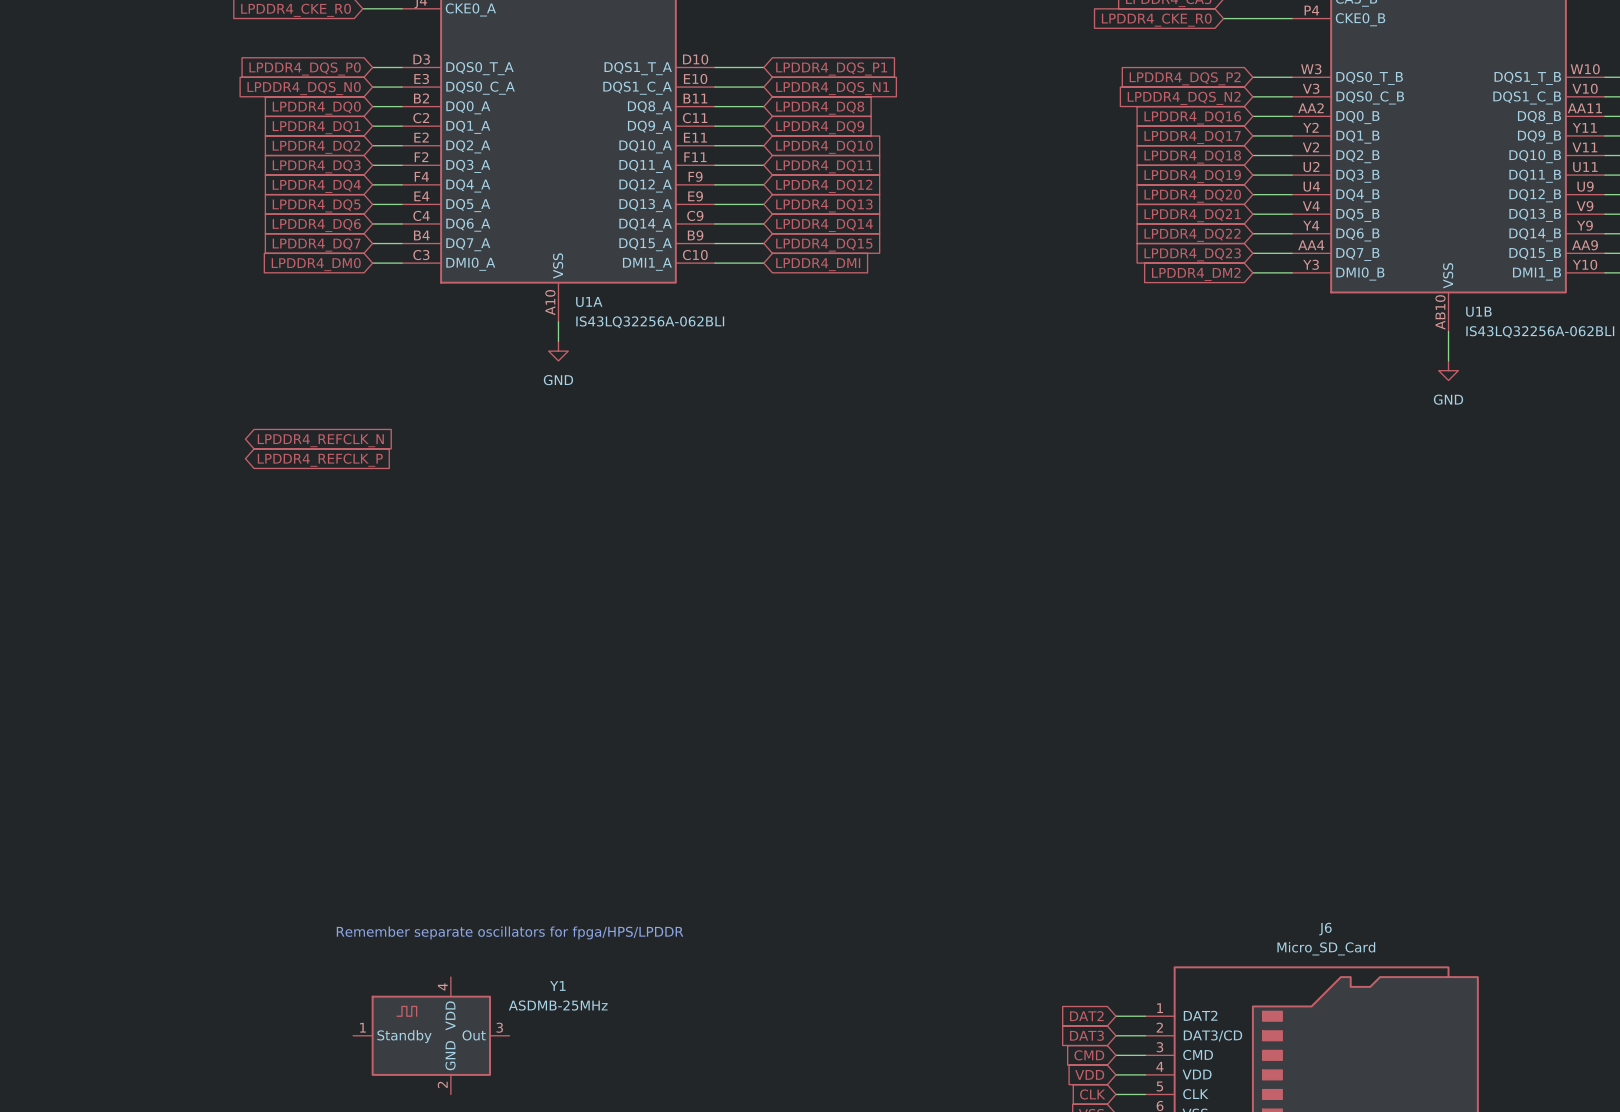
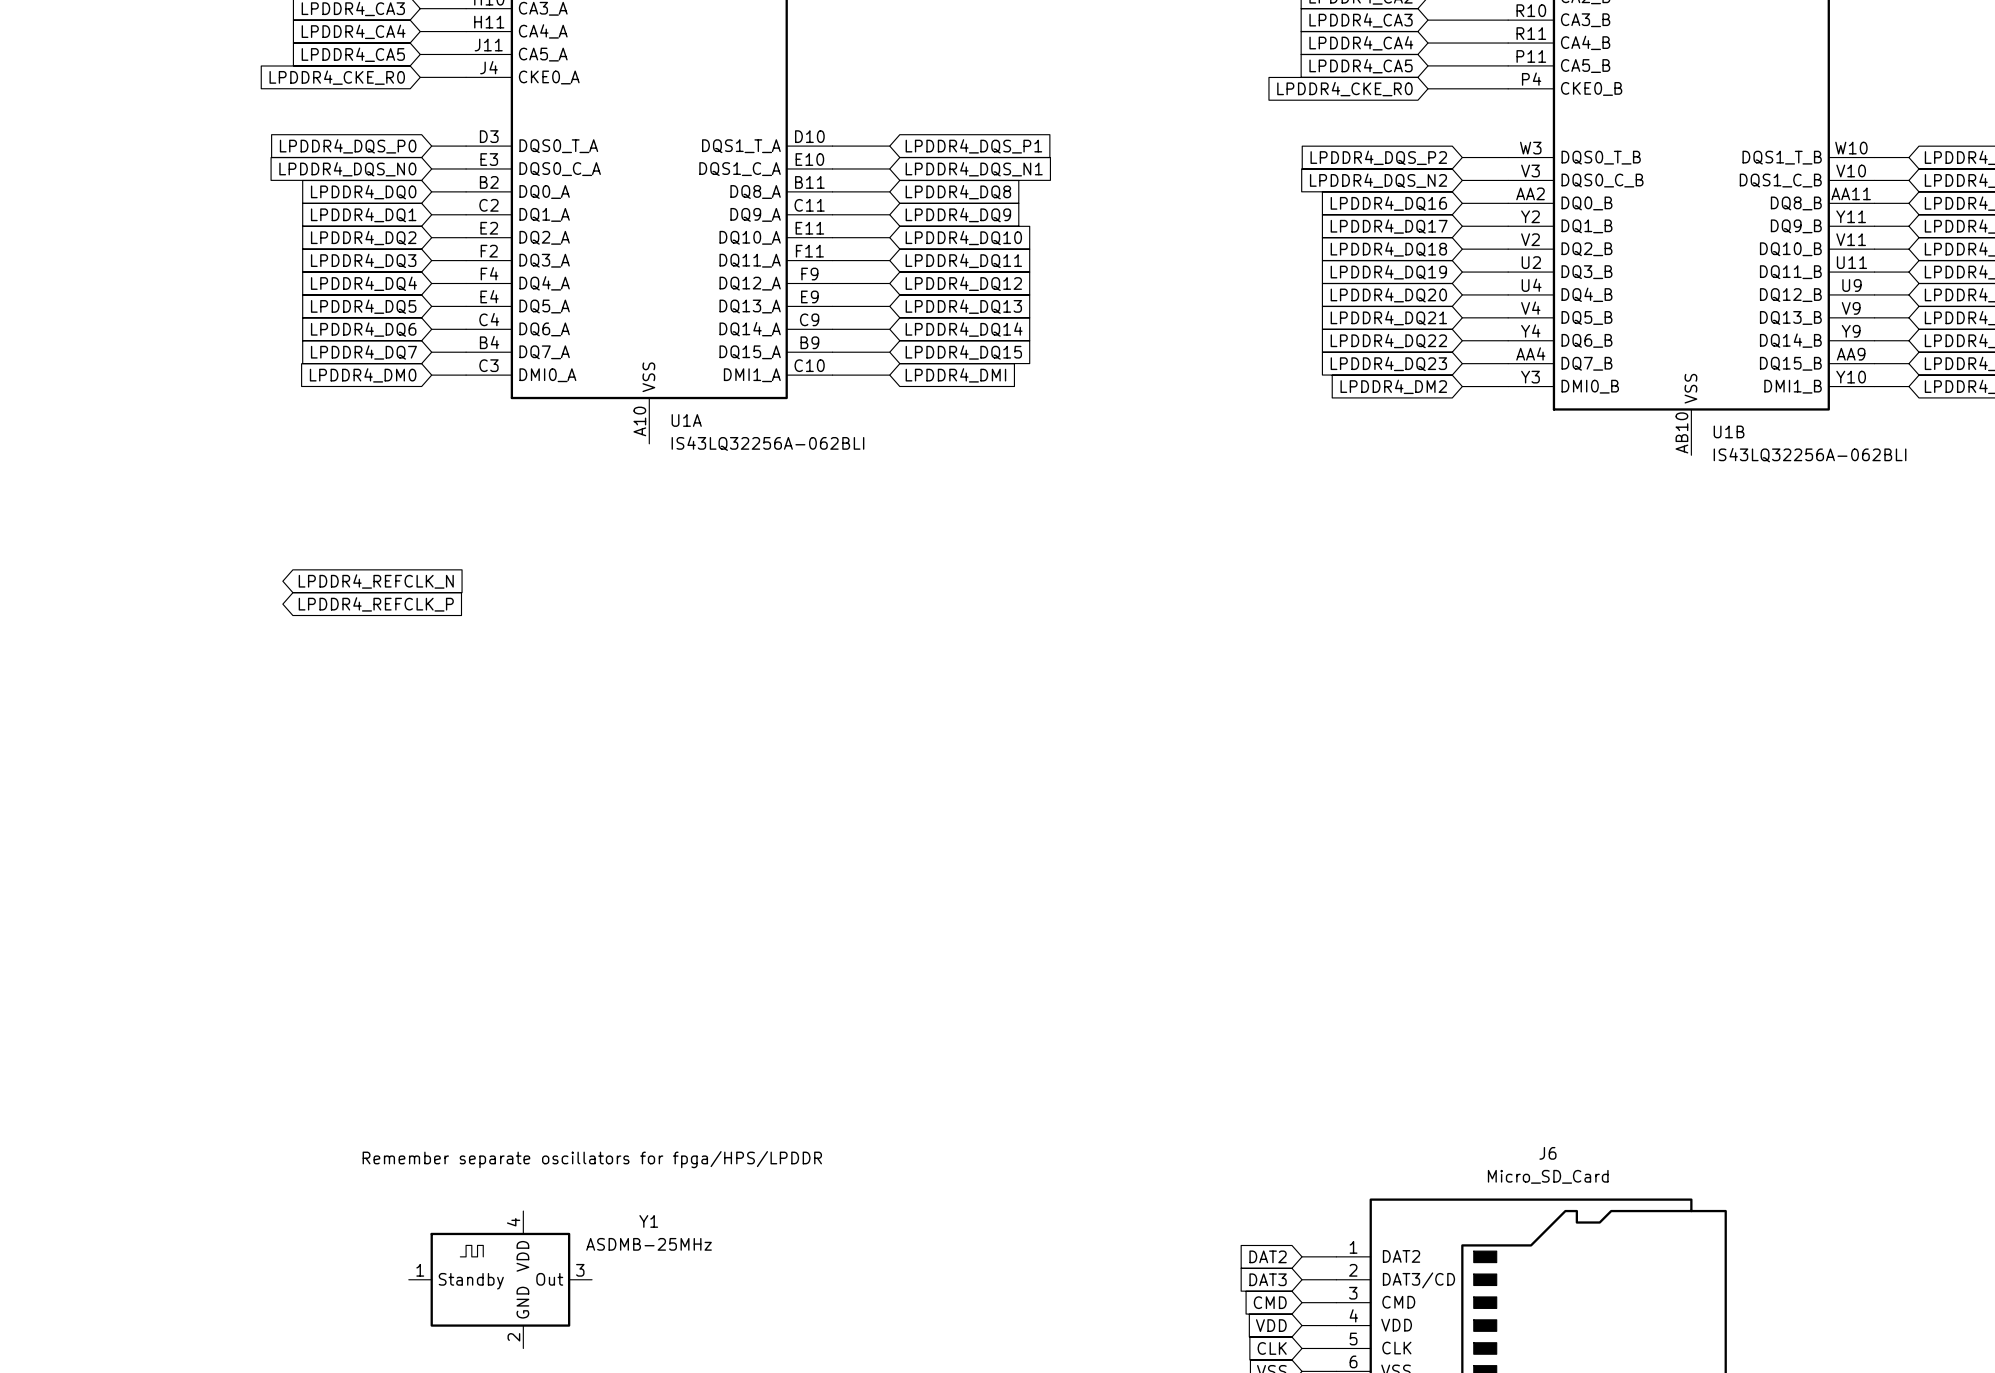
wire: (558, 321) (558, 341) -> none
wire: (1448, 331) (1448, 360) -> none
power symbol: GND (558, 351) -> none
power symbol: GND (1448, 370) -> none

